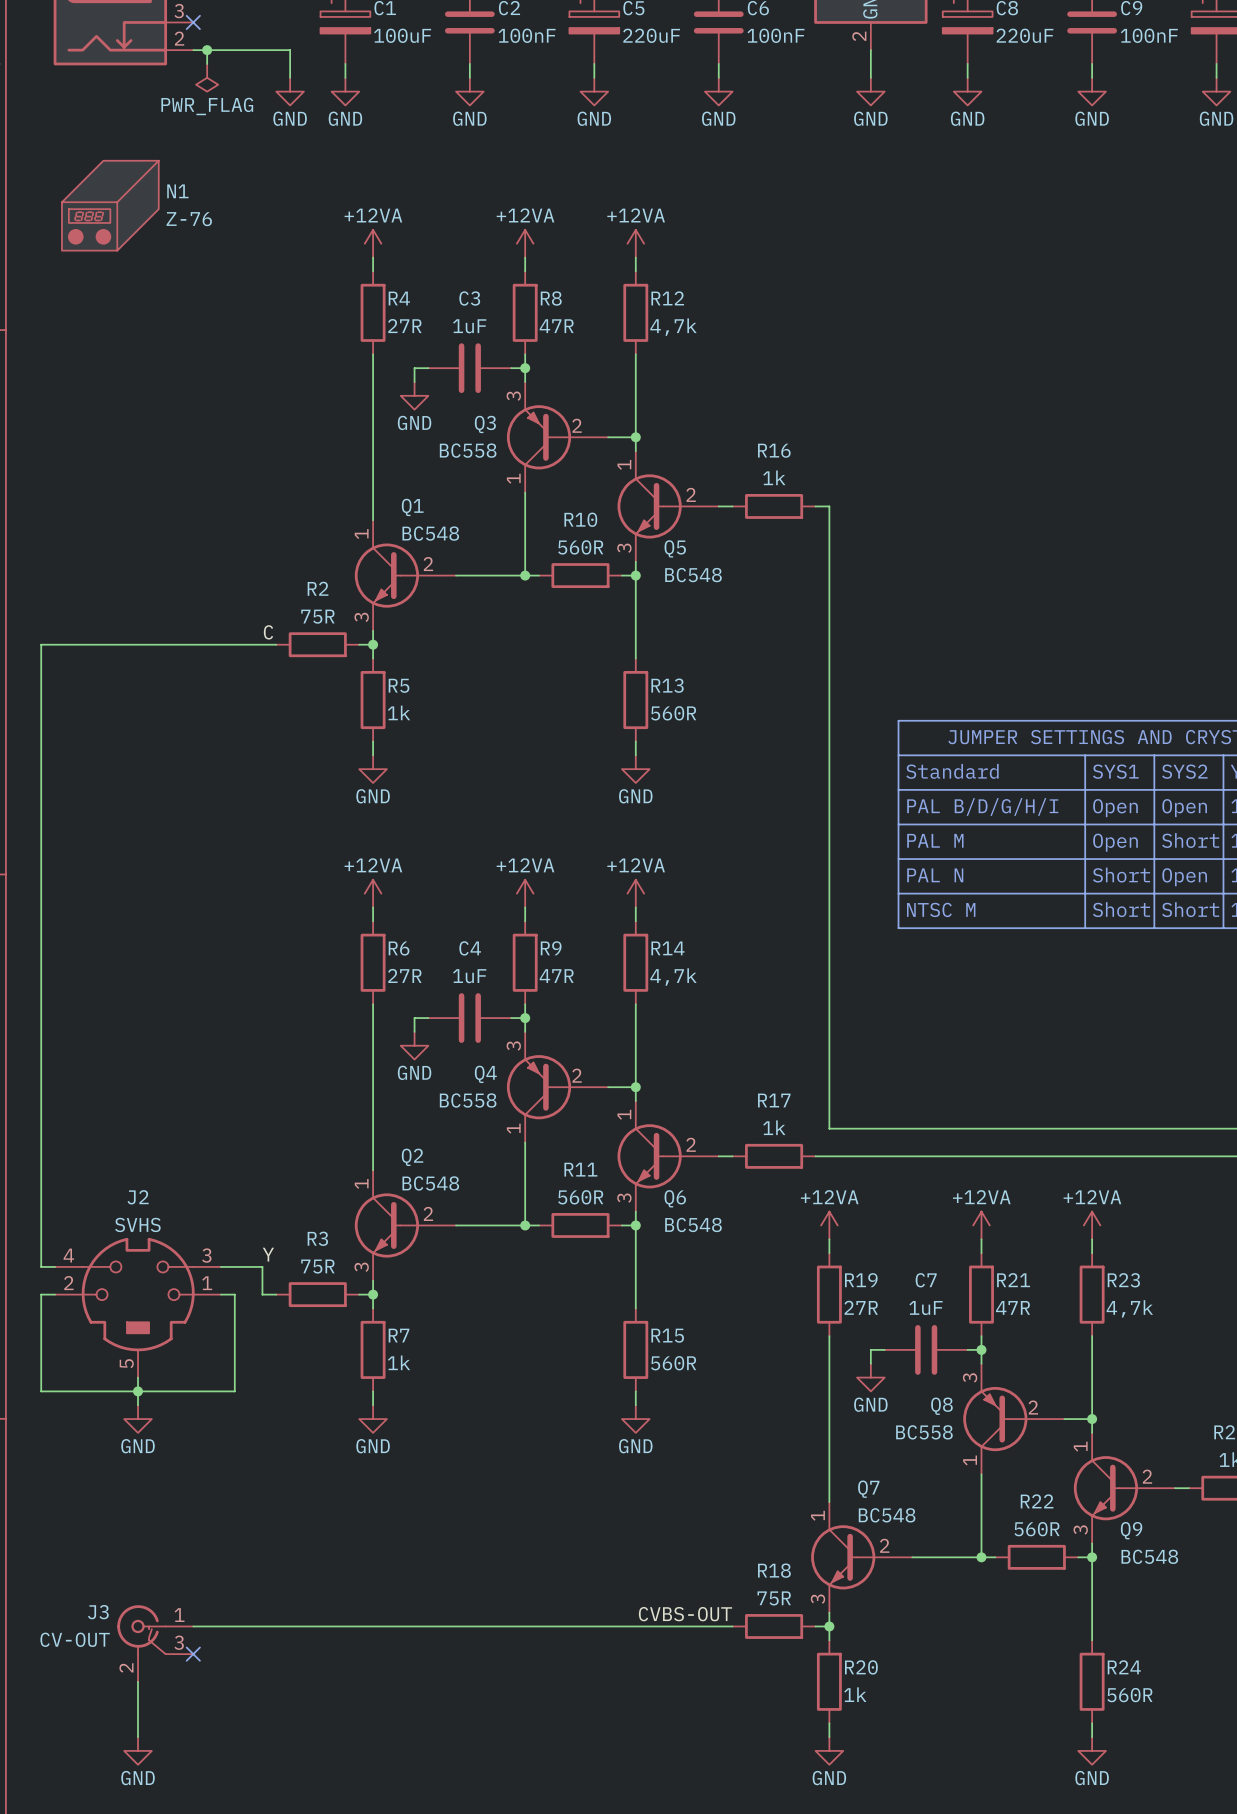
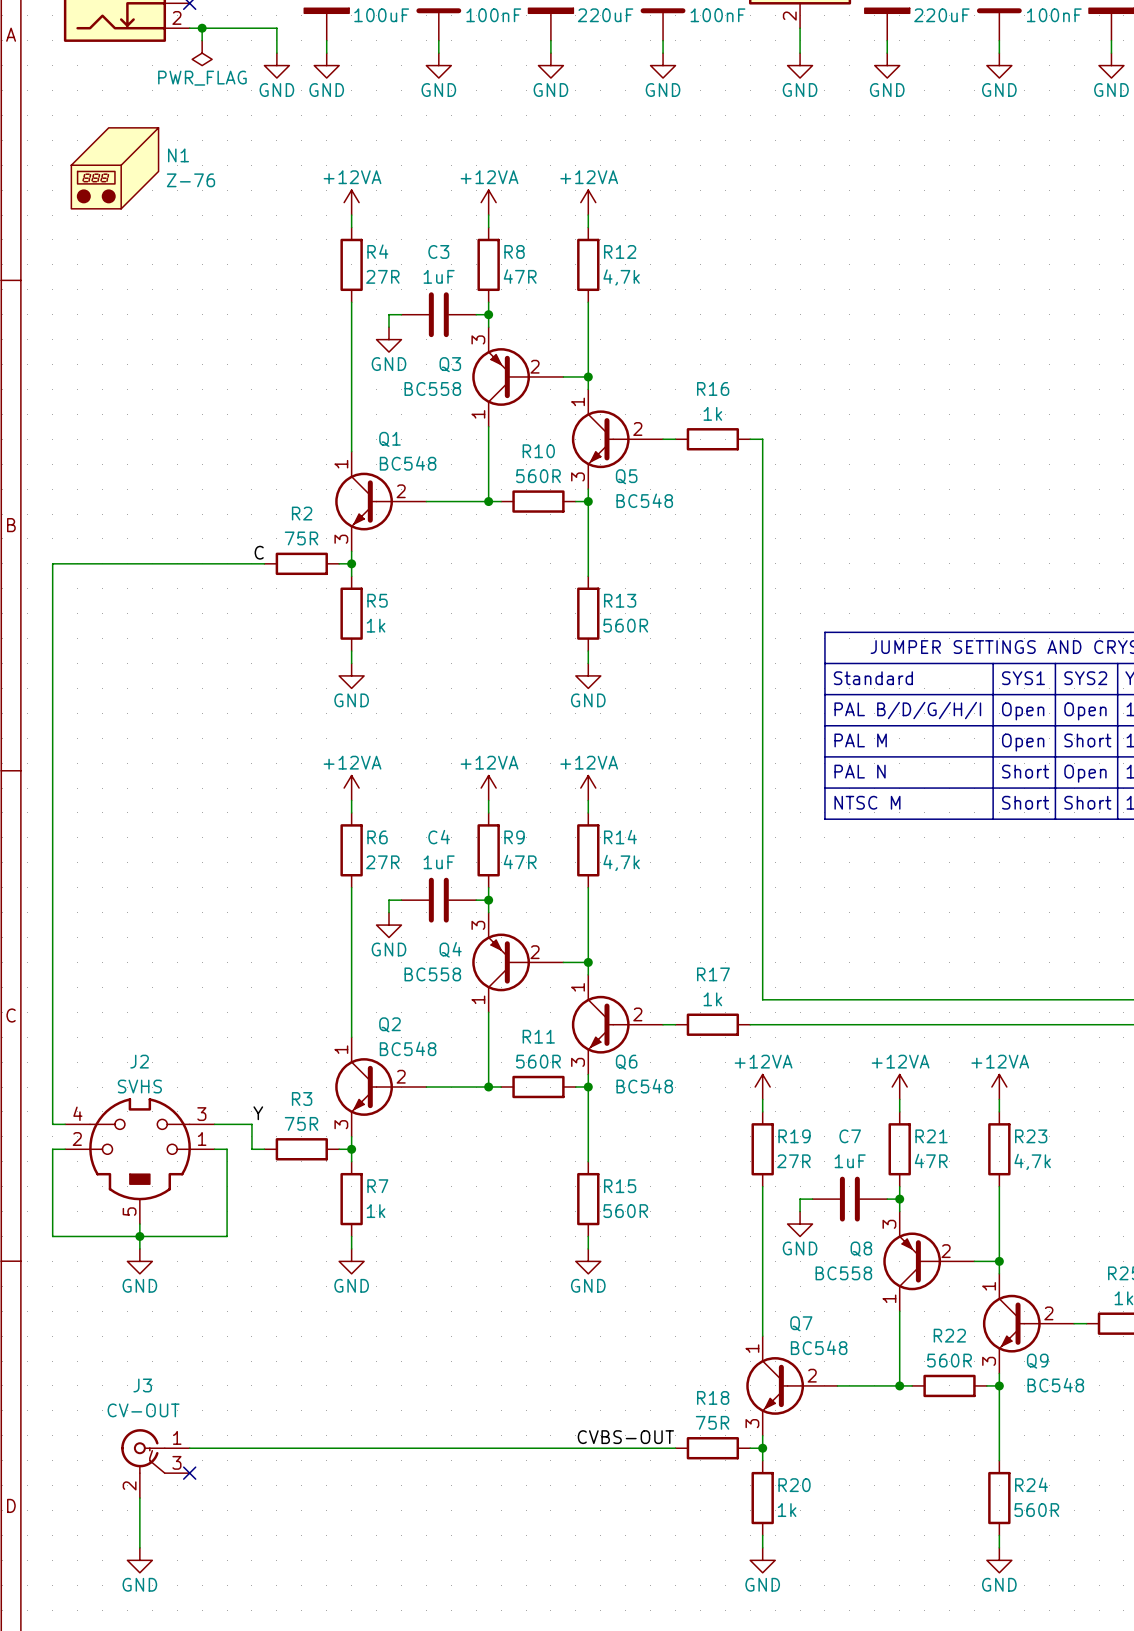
J3 name position: J3 (98, 1612) -> J3 (142, 1385)
J3 value position: CV-OUT (75, 1639) -> CV-OUT (143, 1410)

